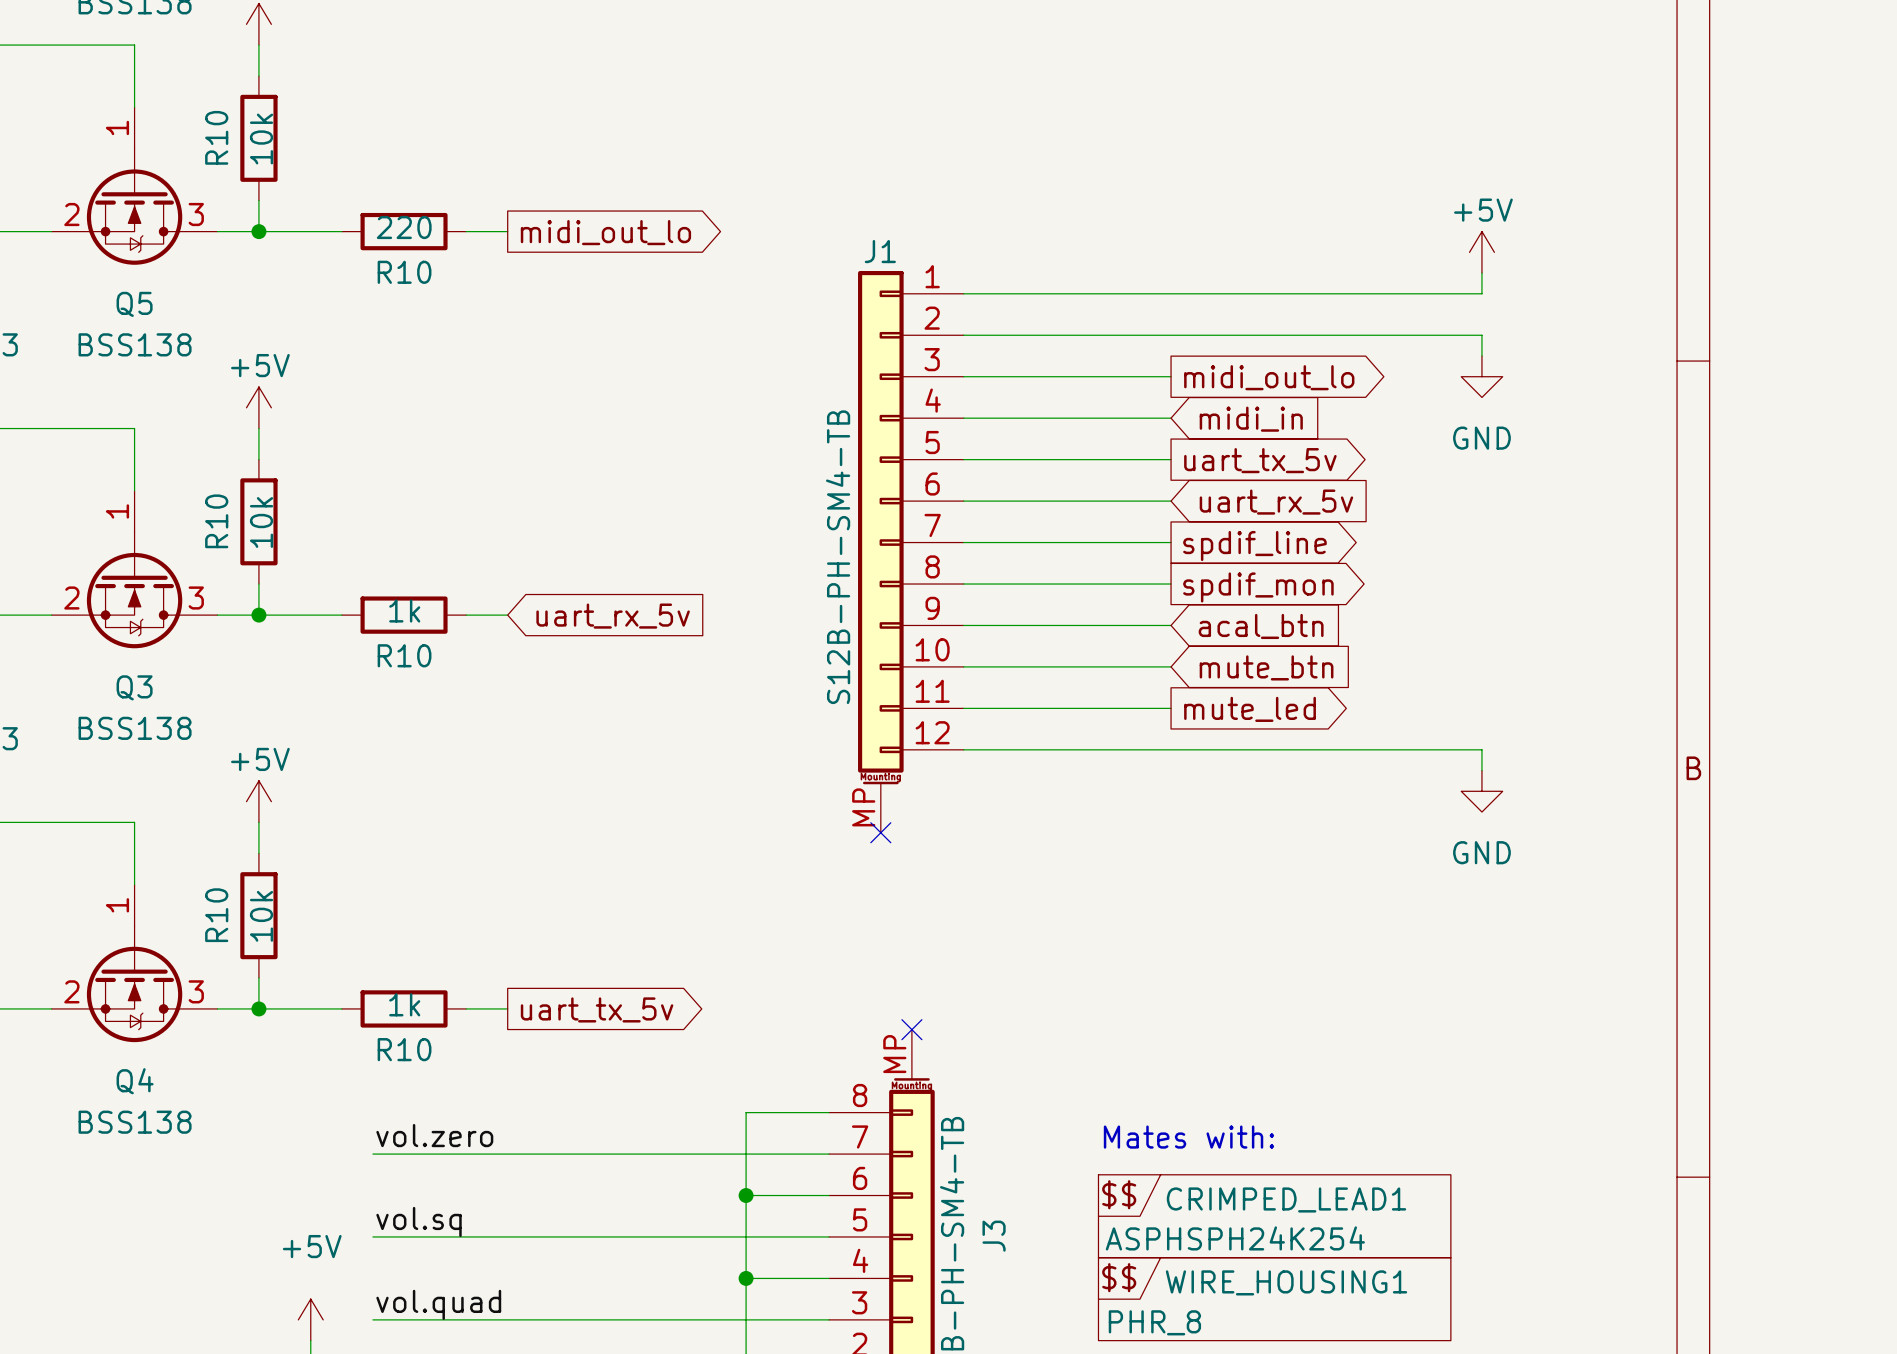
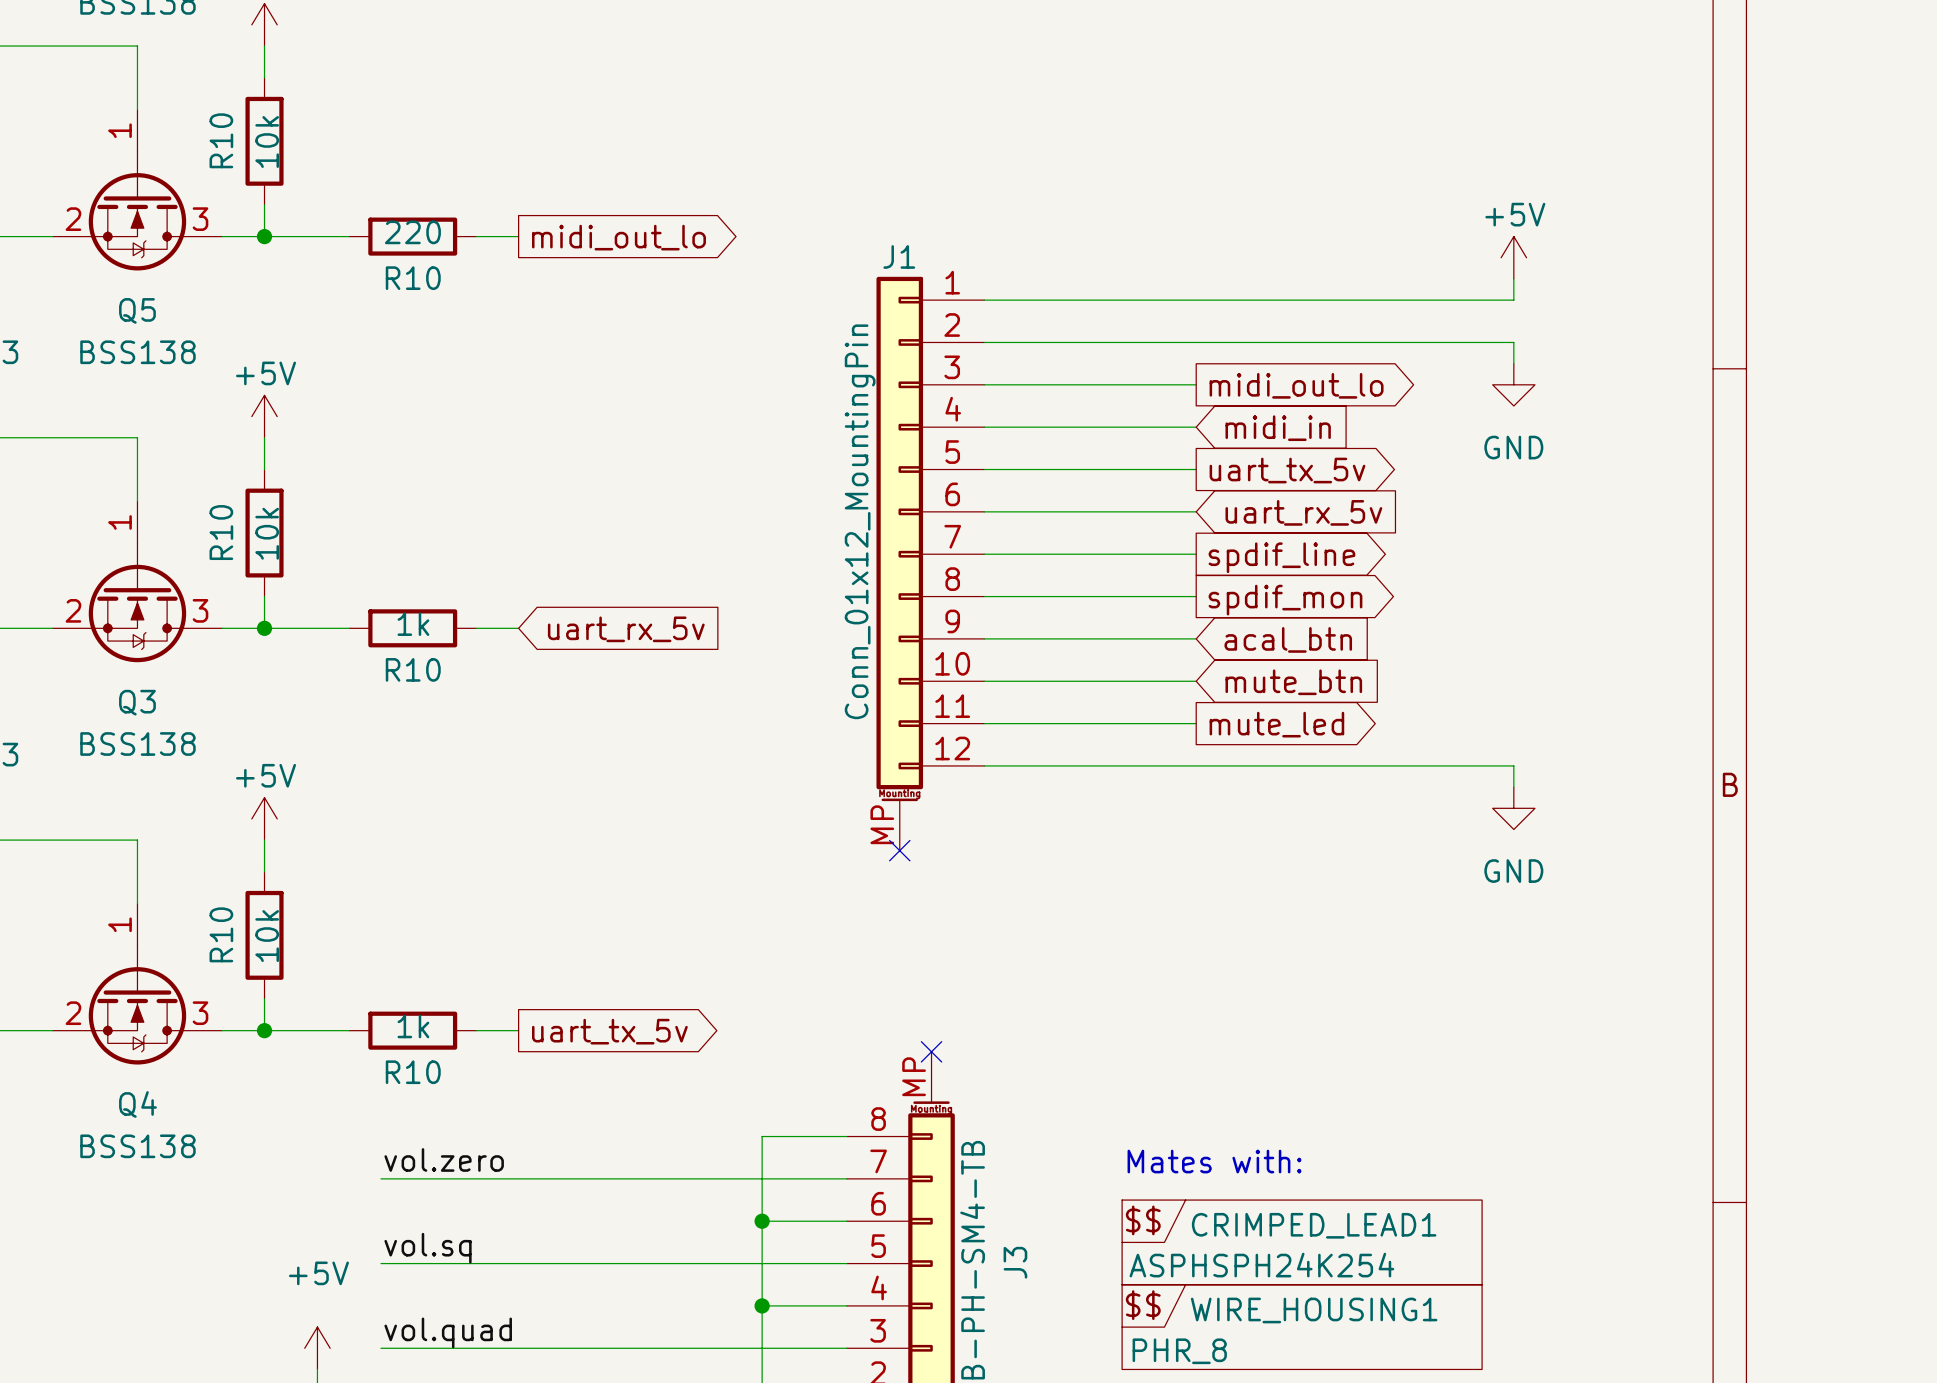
J1 value: S12B-PH-SM4-TB (838, 557) -> Conn_01x12_MountingPin (860, 521)

